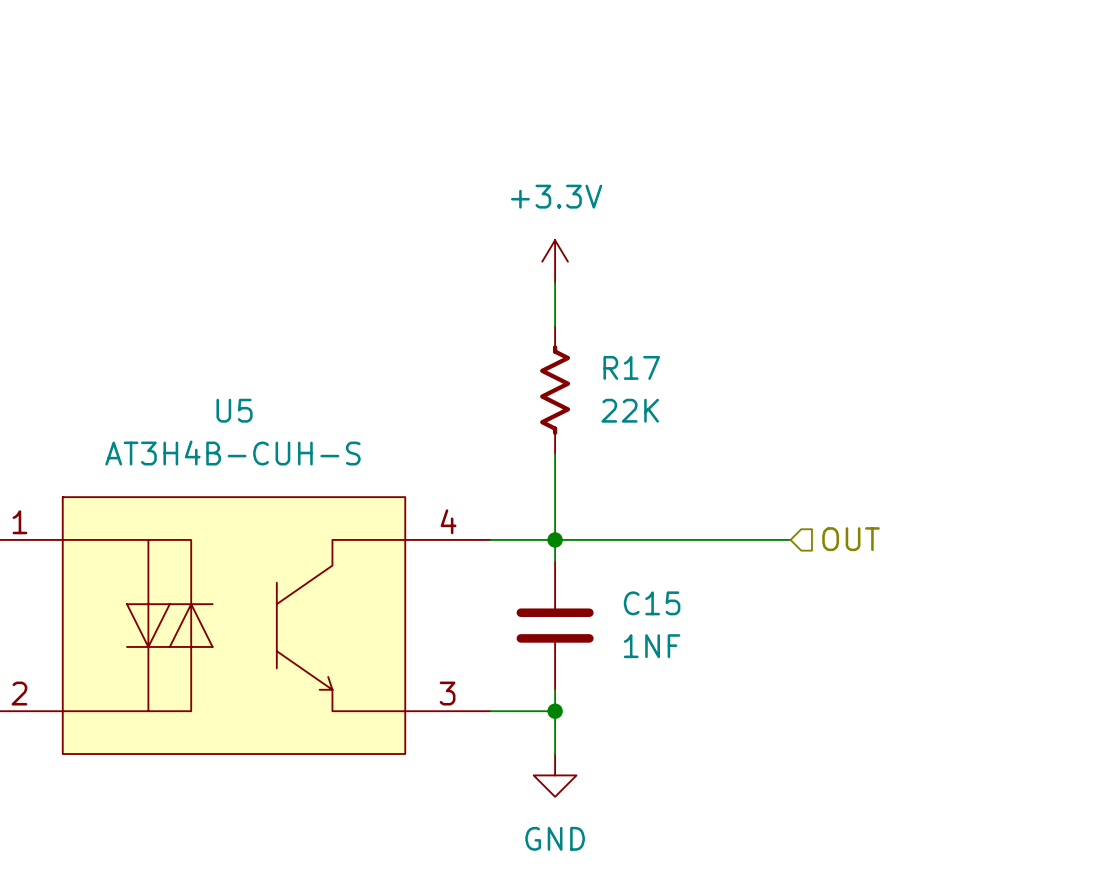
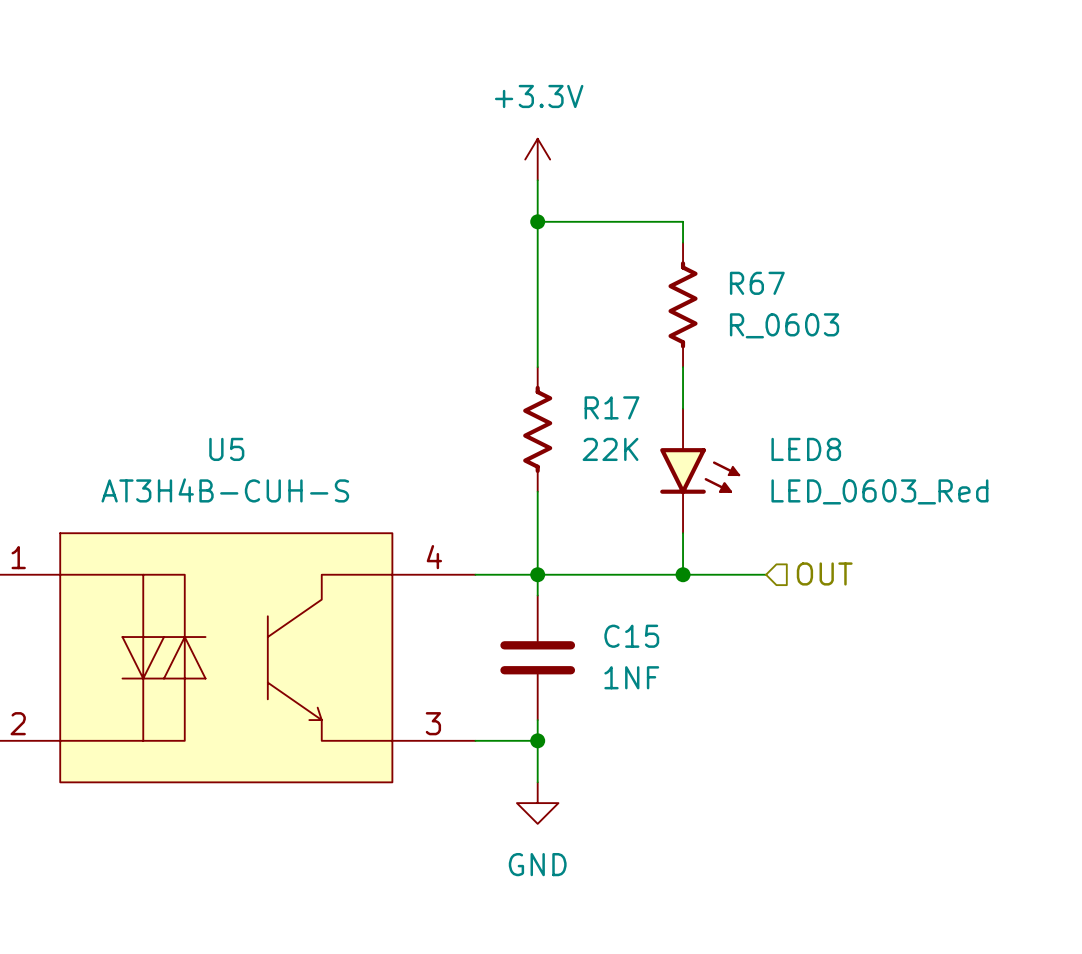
wire: none -> (537, 180) (537, 325)
wire: none -> (537, 221) (683, 221) (683, 242)
junction: none -> (537, 221)
power symbol position: +3.3V (555, 261) -> +3.3V (537, 159)
R67: none -> R_0603 (683, 304)
wire: none -> (683, 367) (683, 408)
LED8: none -> LED_0603_Red (700, 470)
wire: none -> (683, 533) (683, 574)
junction: none -> (683, 574)

